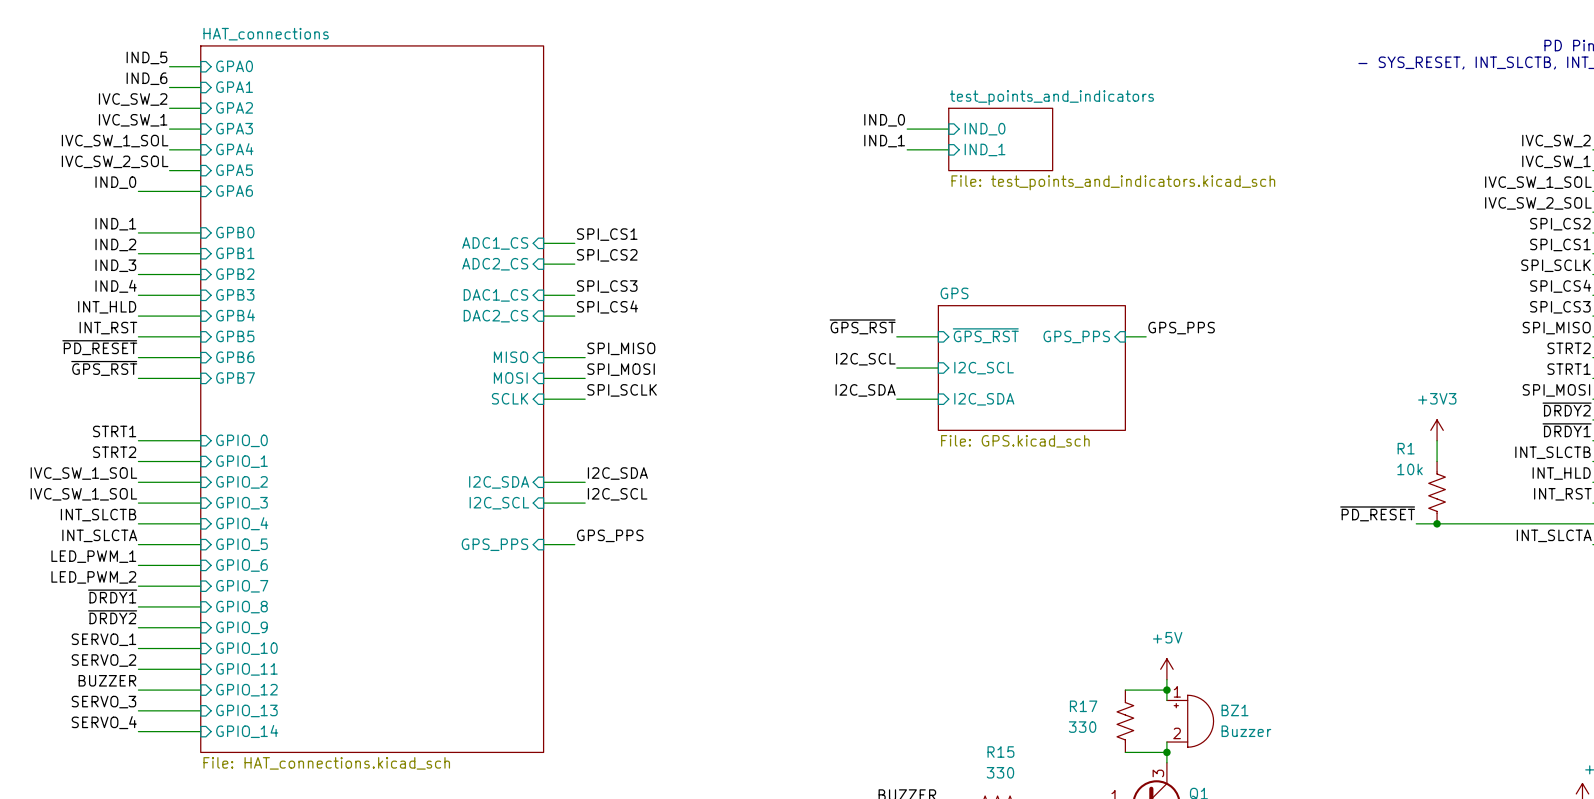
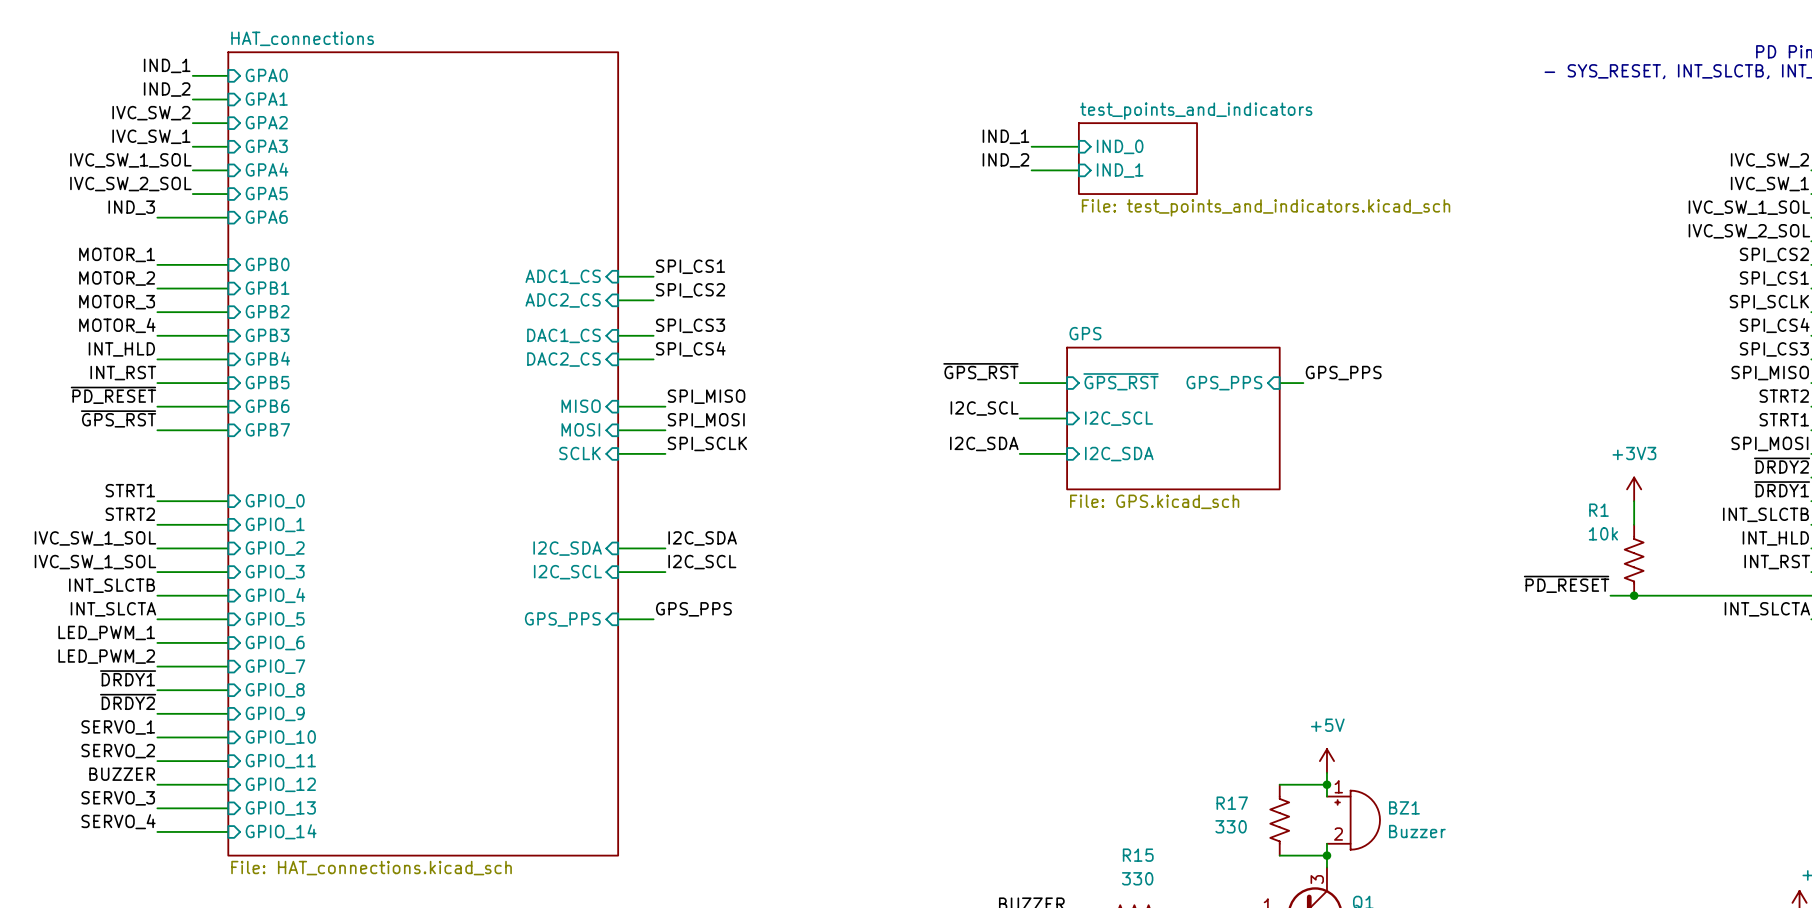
label: IND_5 (146, 57) -> IND_1 (167, 65)
label: IND_6 (146, 78) -> IND_2 (167, 89)
label: IND_0 (884, 120) -> IND_1 (1005, 136)
label: IND_1 (884, 141) -> IND_2 (1005, 160)
label: IND_0 (115, 182) -> IND_3 (131, 207)
label: IND_1 (115, 224) -> MOTOR_1 (117, 254)
label: IND_2 (115, 244) -> MOTOR_2 (117, 278)
label: IND_3 (115, 265) -> MOTOR_3 (117, 302)
label: IND_4 (116, 286) -> MOTOR_4 (117, 325)

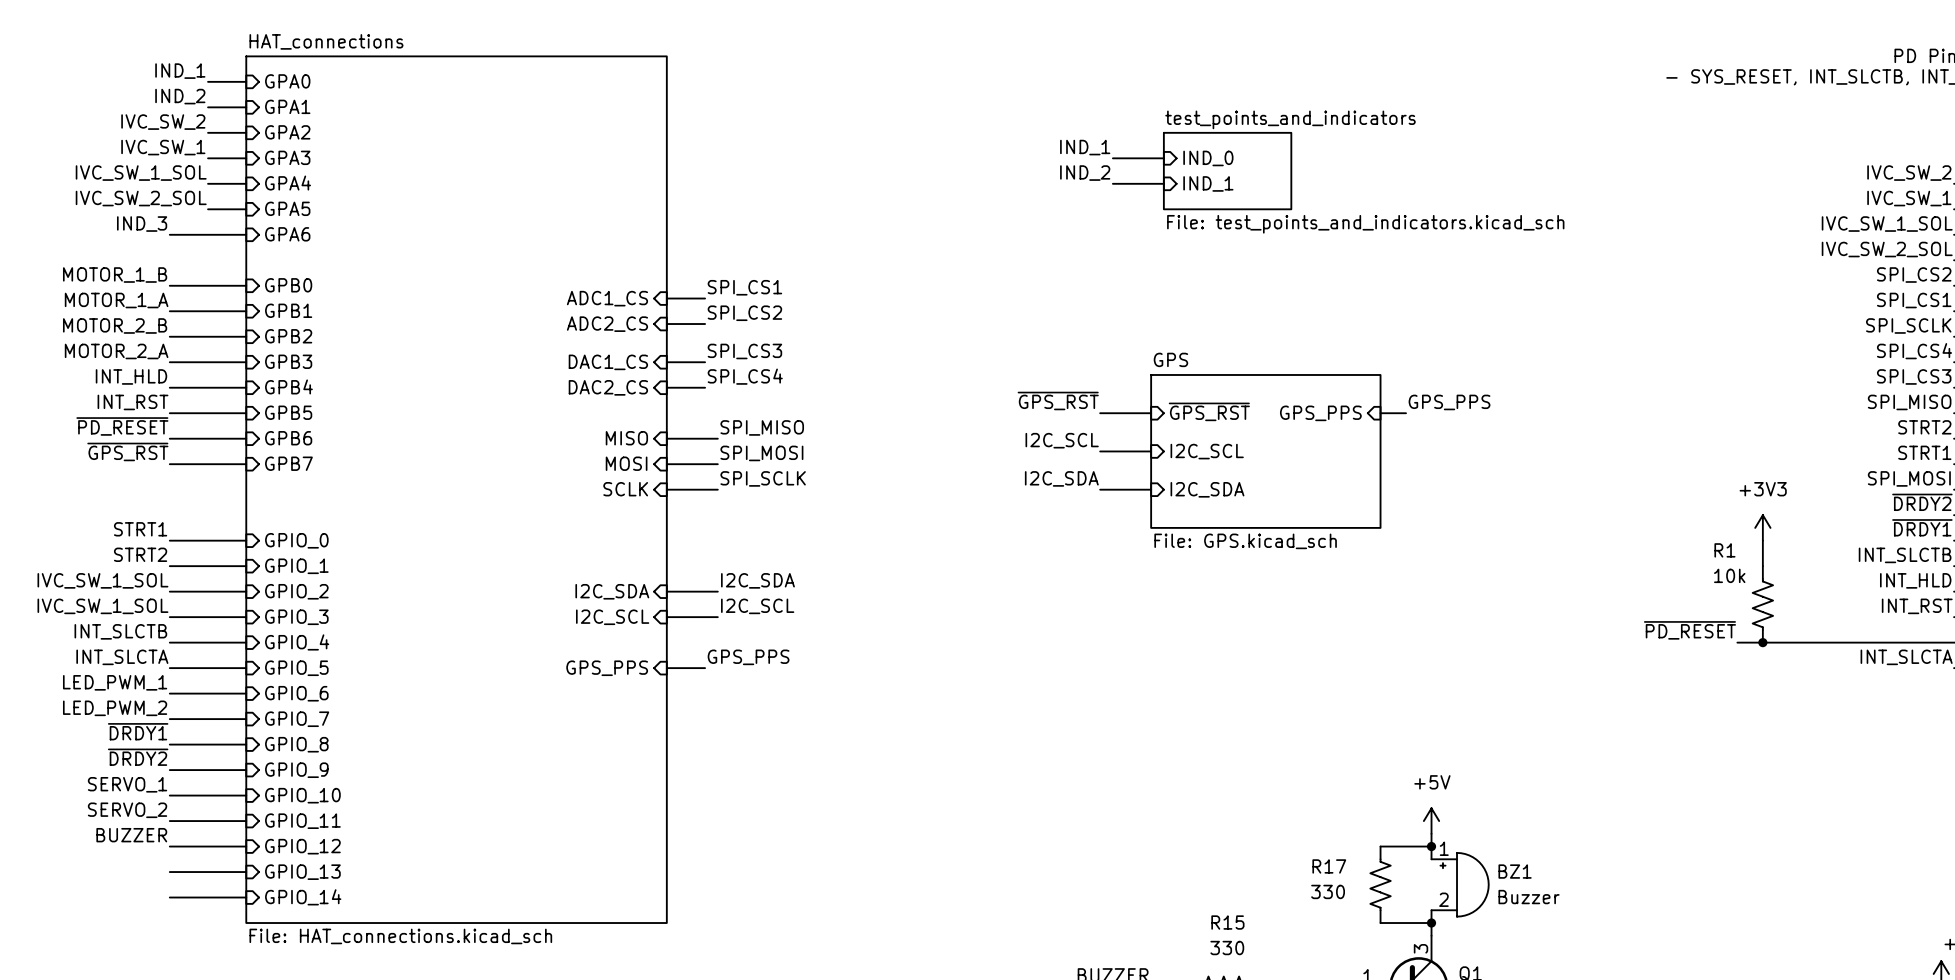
label: MOTOR_1 (117, 254) -> MOTOR_1_B (115, 275)
label: MOTOR_2 (117, 278) -> MOTOR_1_A (116, 300)
label: MOTOR_3 (117, 302) -> MOTOR_2_B (115, 325)
label: MOTOR_4 (117, 325) -> MOTOR_2_A (116, 351)
label: SERVO_3 (118, 798) -> none
label: SERVO_4 (118, 821) -> none

